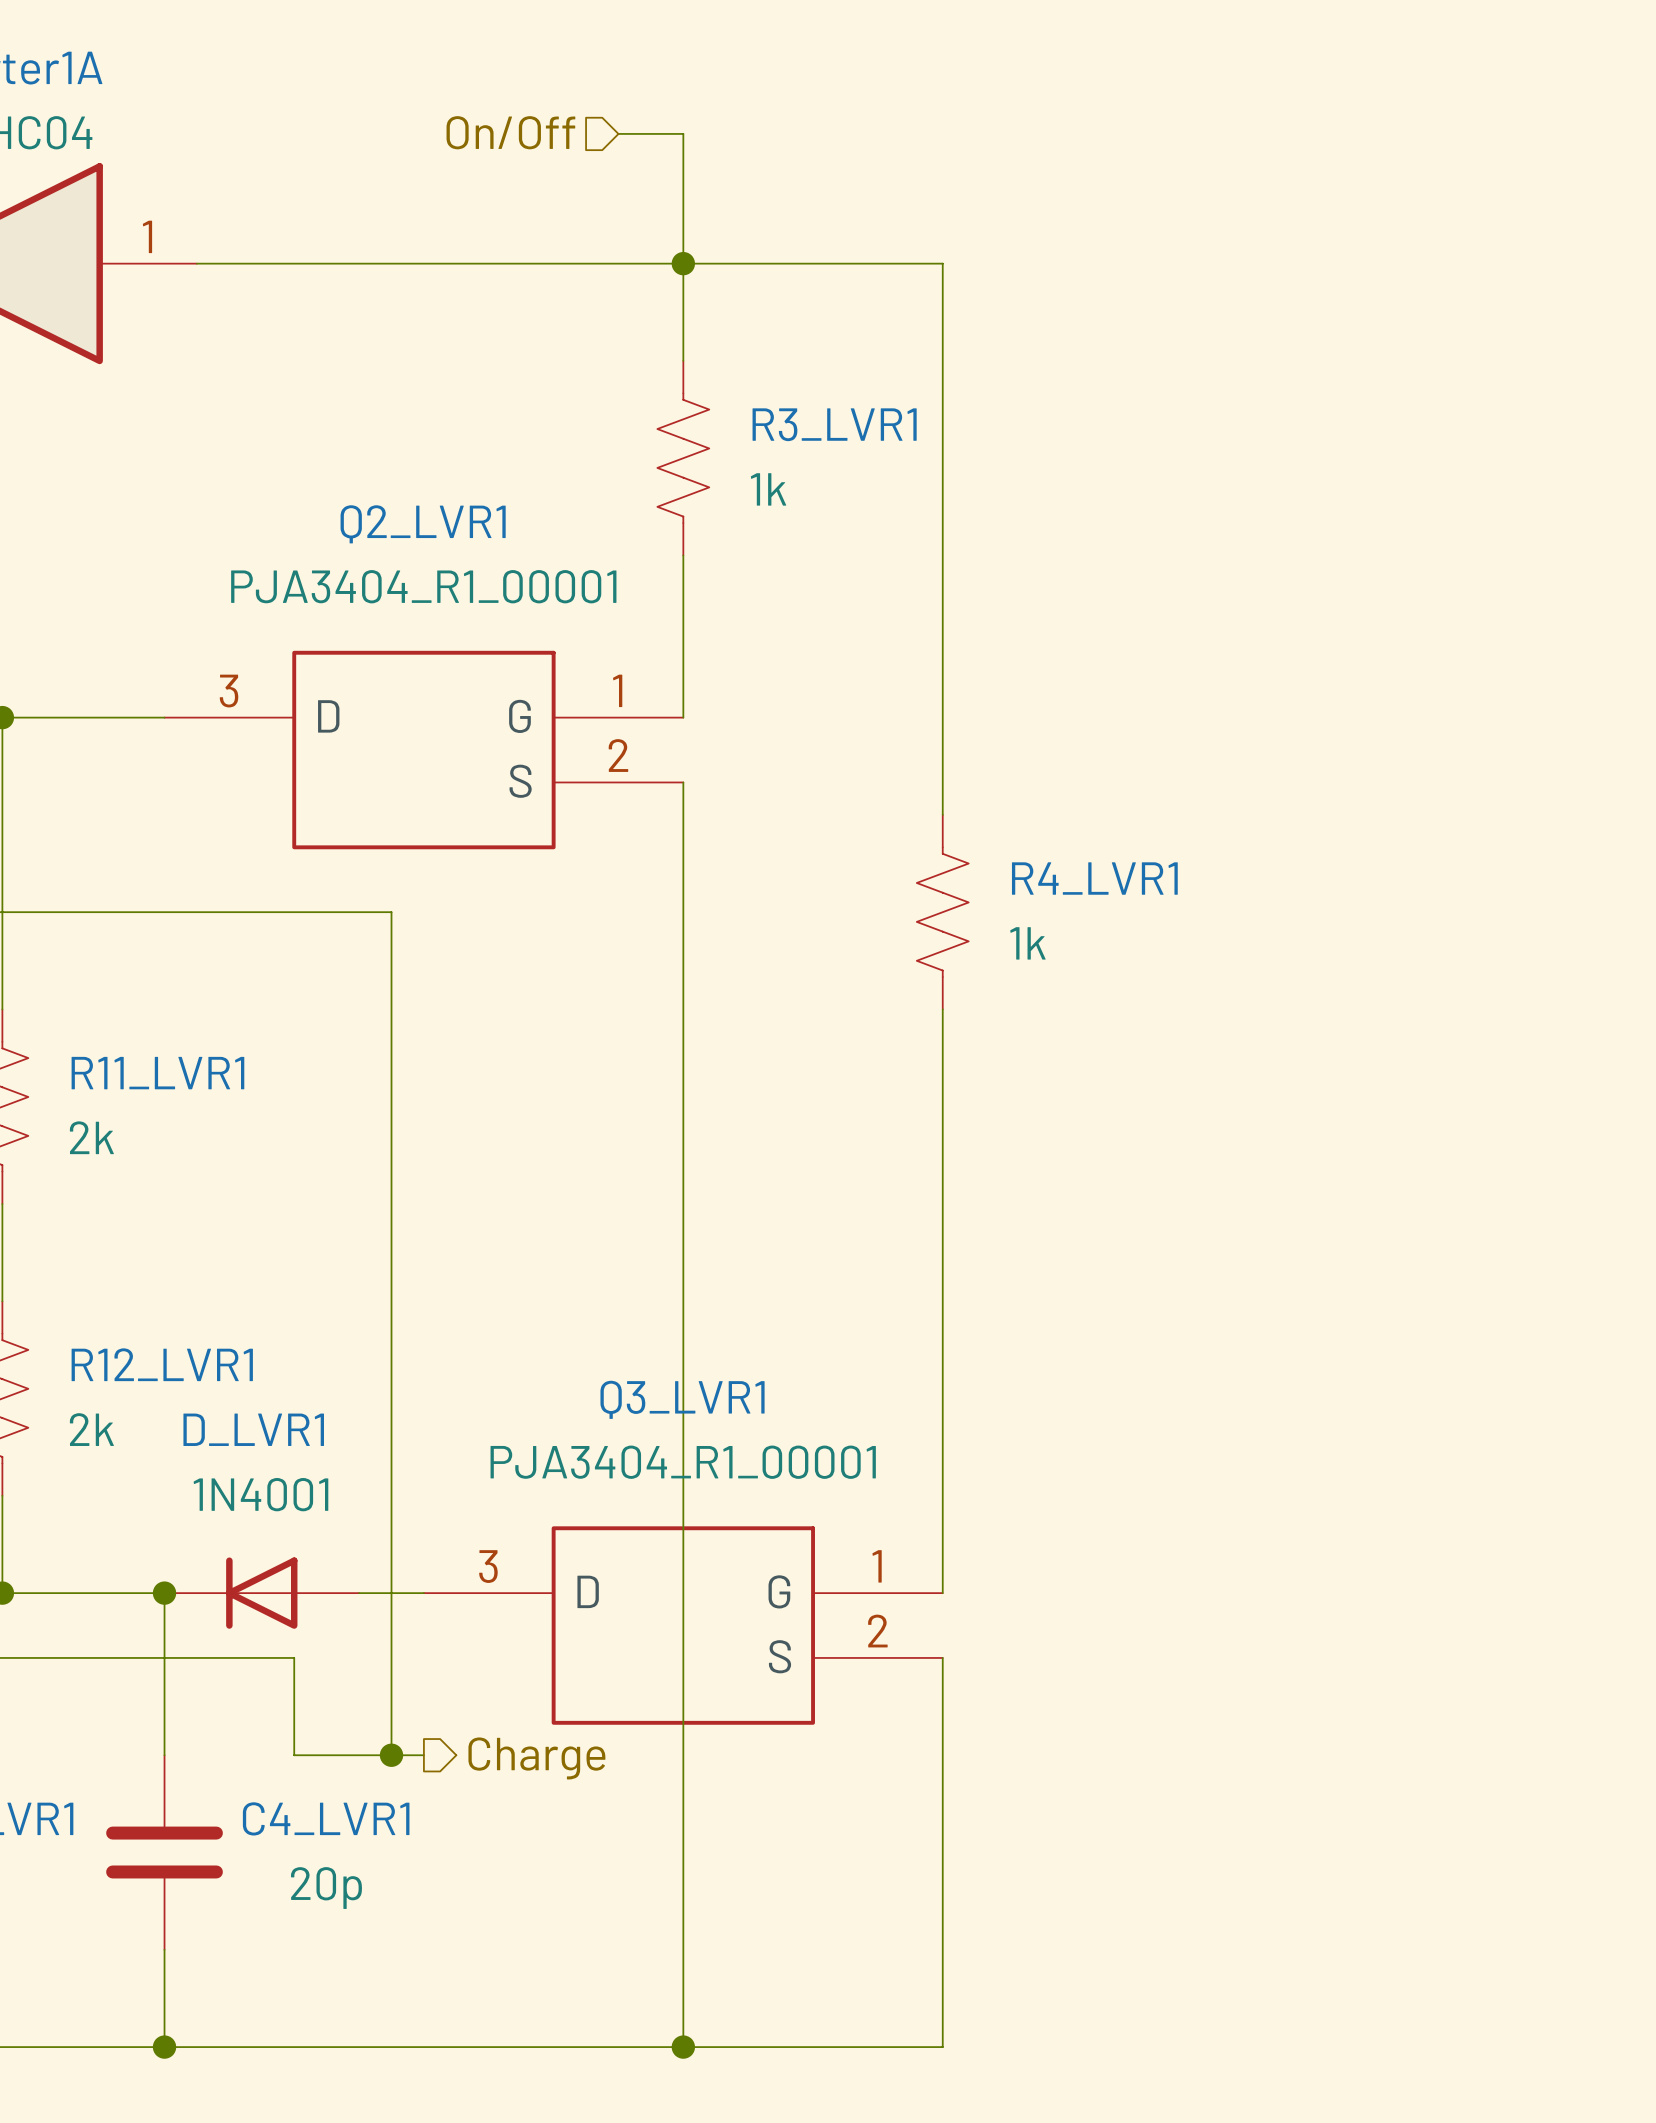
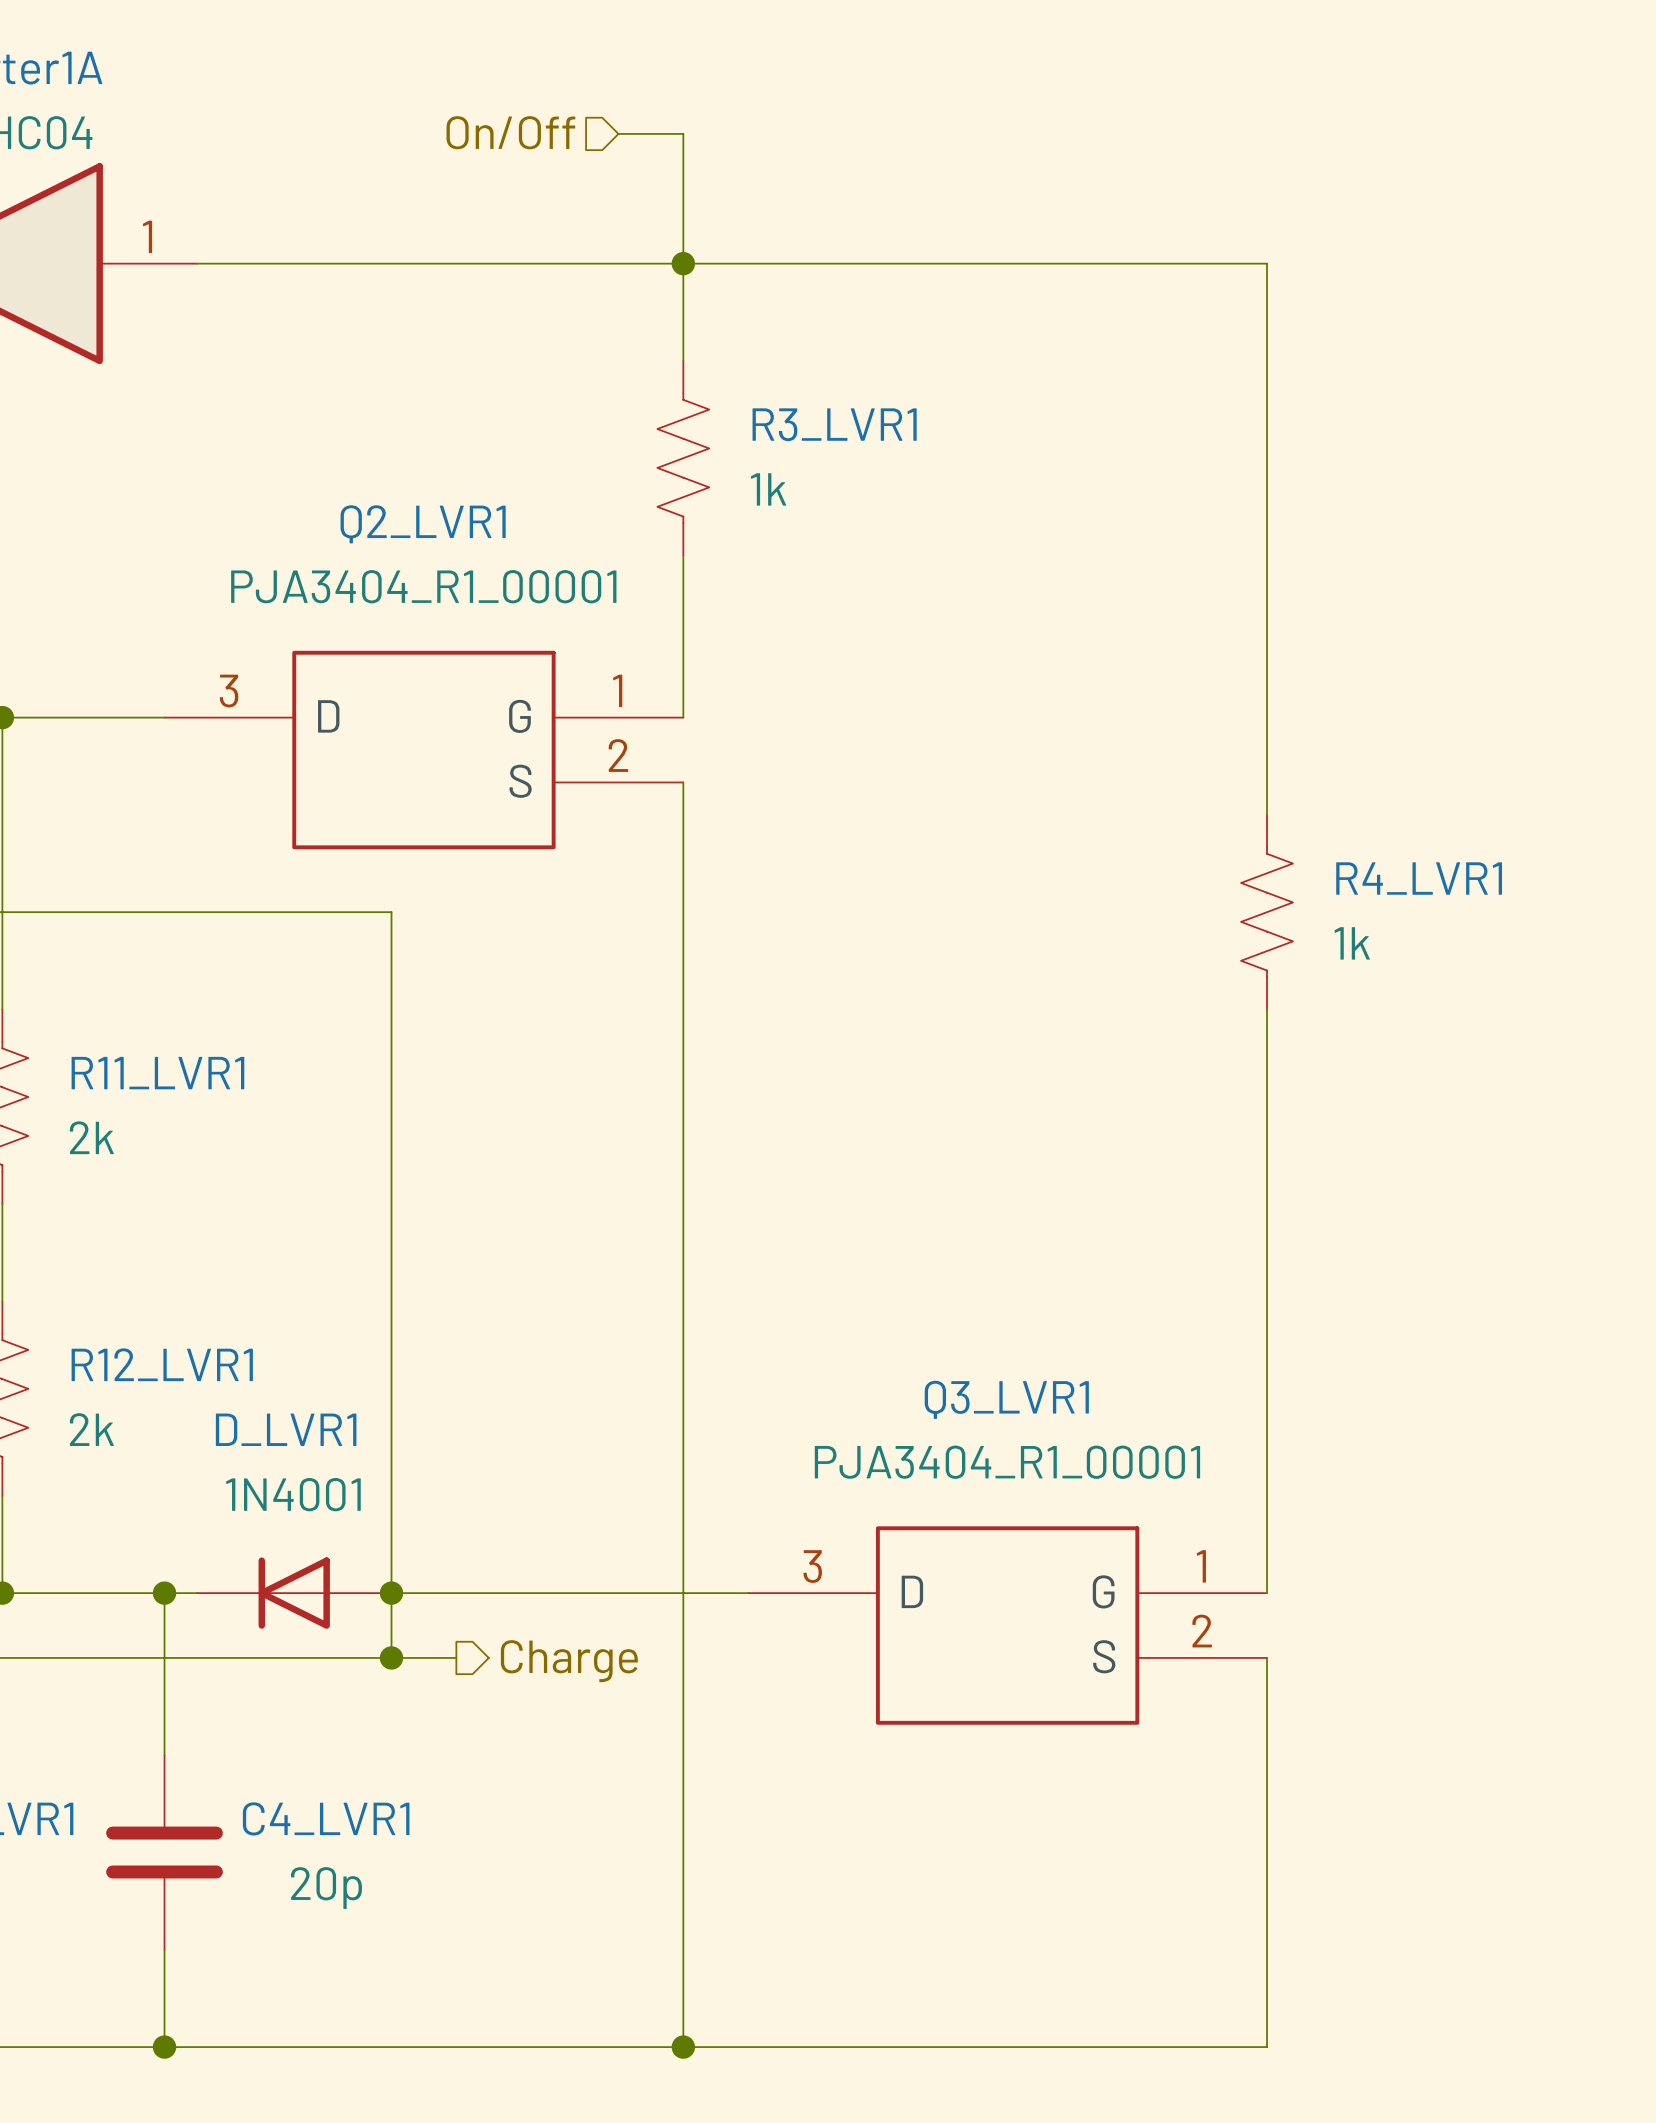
wire: (942, 263) (942, 814) -> (942, 263) (1267, 263) (1267, 814)
R4_LVR1 position: (942, 912) -> (1267, 912)
wire: (942, 1009) (942, 1593) -> (1267, 1009) (1267, 1593)
D_LVR1 position: (261, 1593) -> (294, 1593)
junction: none -> (391, 1593)
wire: none -> (423, 1593) (748, 1593)
Q3_LVR1 position: (683, 1625) -> (1007, 1625)
wire: (294, 1657) (294, 1755) (423, 1755) -> (294, 1657) (456, 1657)
wire: (391, 1657) (391, 1755) -> none
junction: none -> (391, 1657)
wire: (942, 1657) (942, 2047) -> (1267, 1657) (1267, 2047) (942, 2047)
junction: (391, 1755) -> none
hierarchical label position: Charge (536, 1758) -> Charge (569, 1661)

